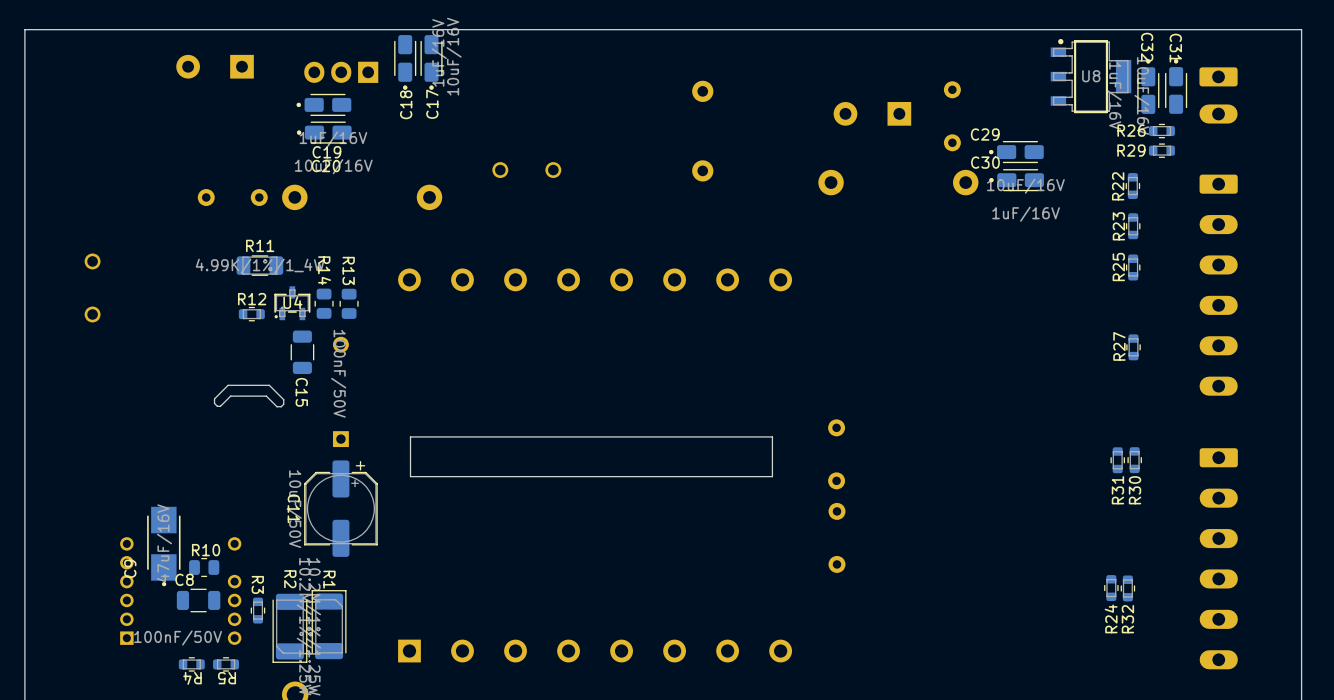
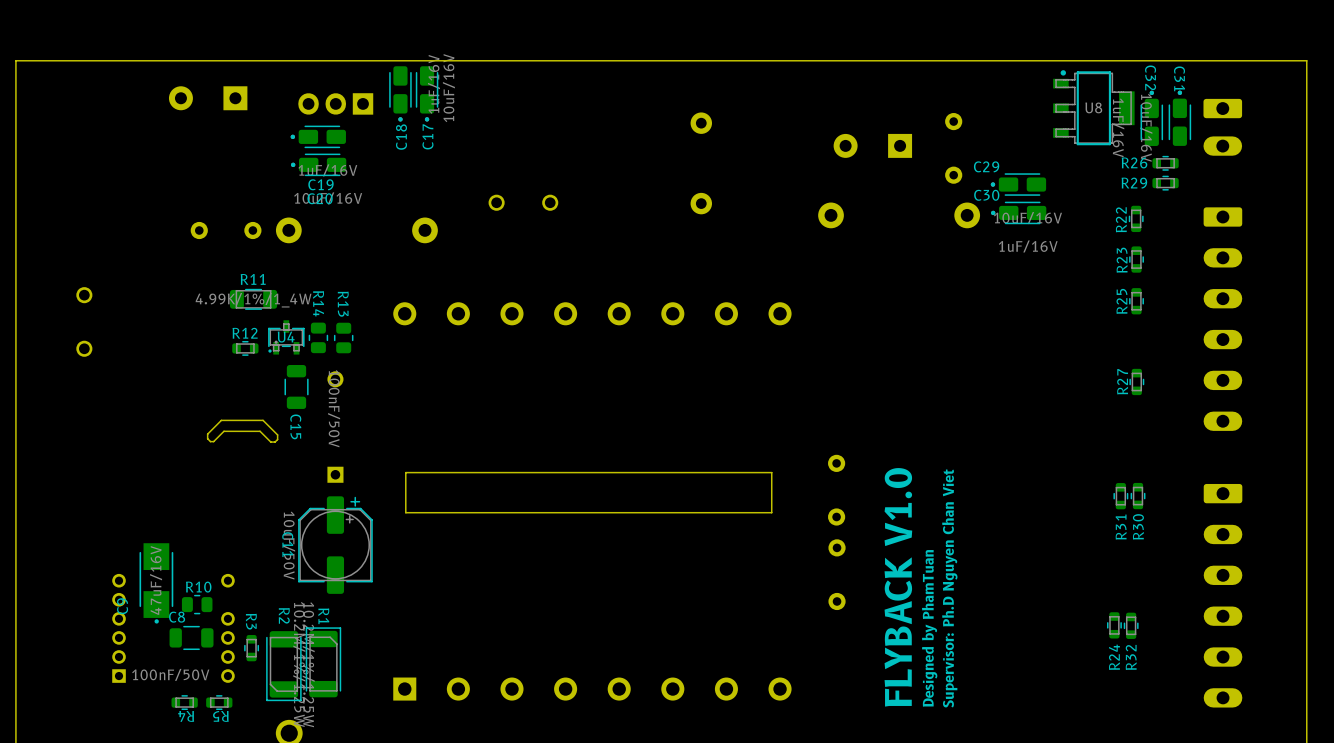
text: none -> Supervisor: Ph.D Nguyen Chan Viet (949, 588)
text: none -> FLYBACK V1.0 (898, 587)
text: none -> Designed by PhamTuan (929, 628)

